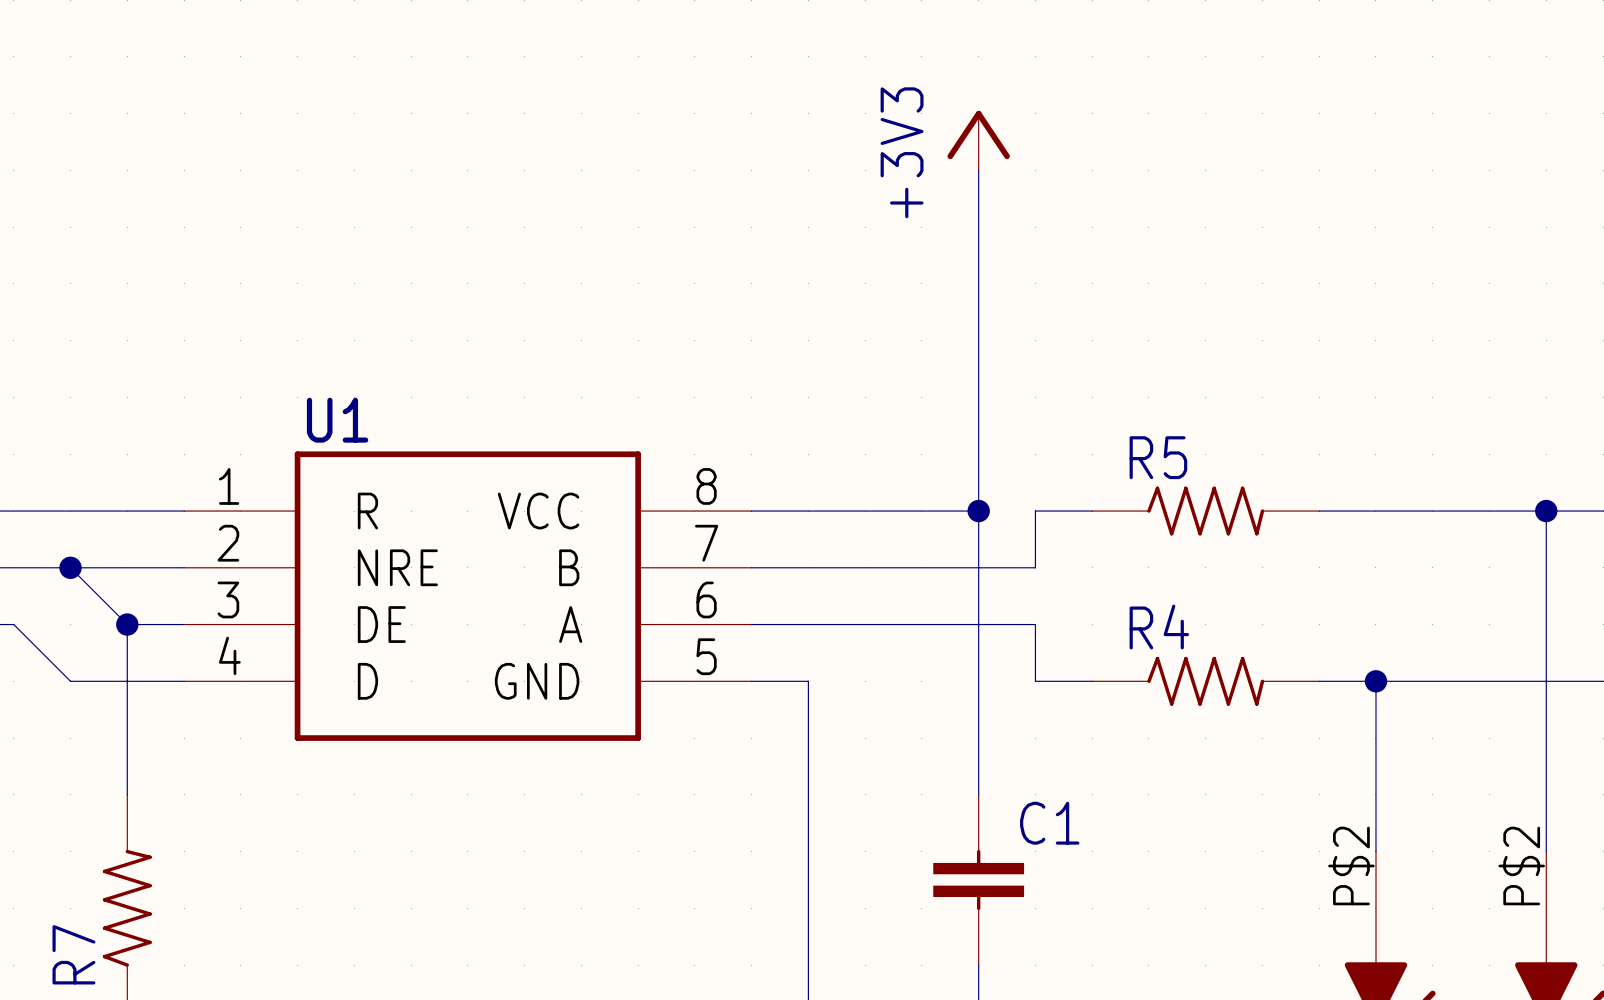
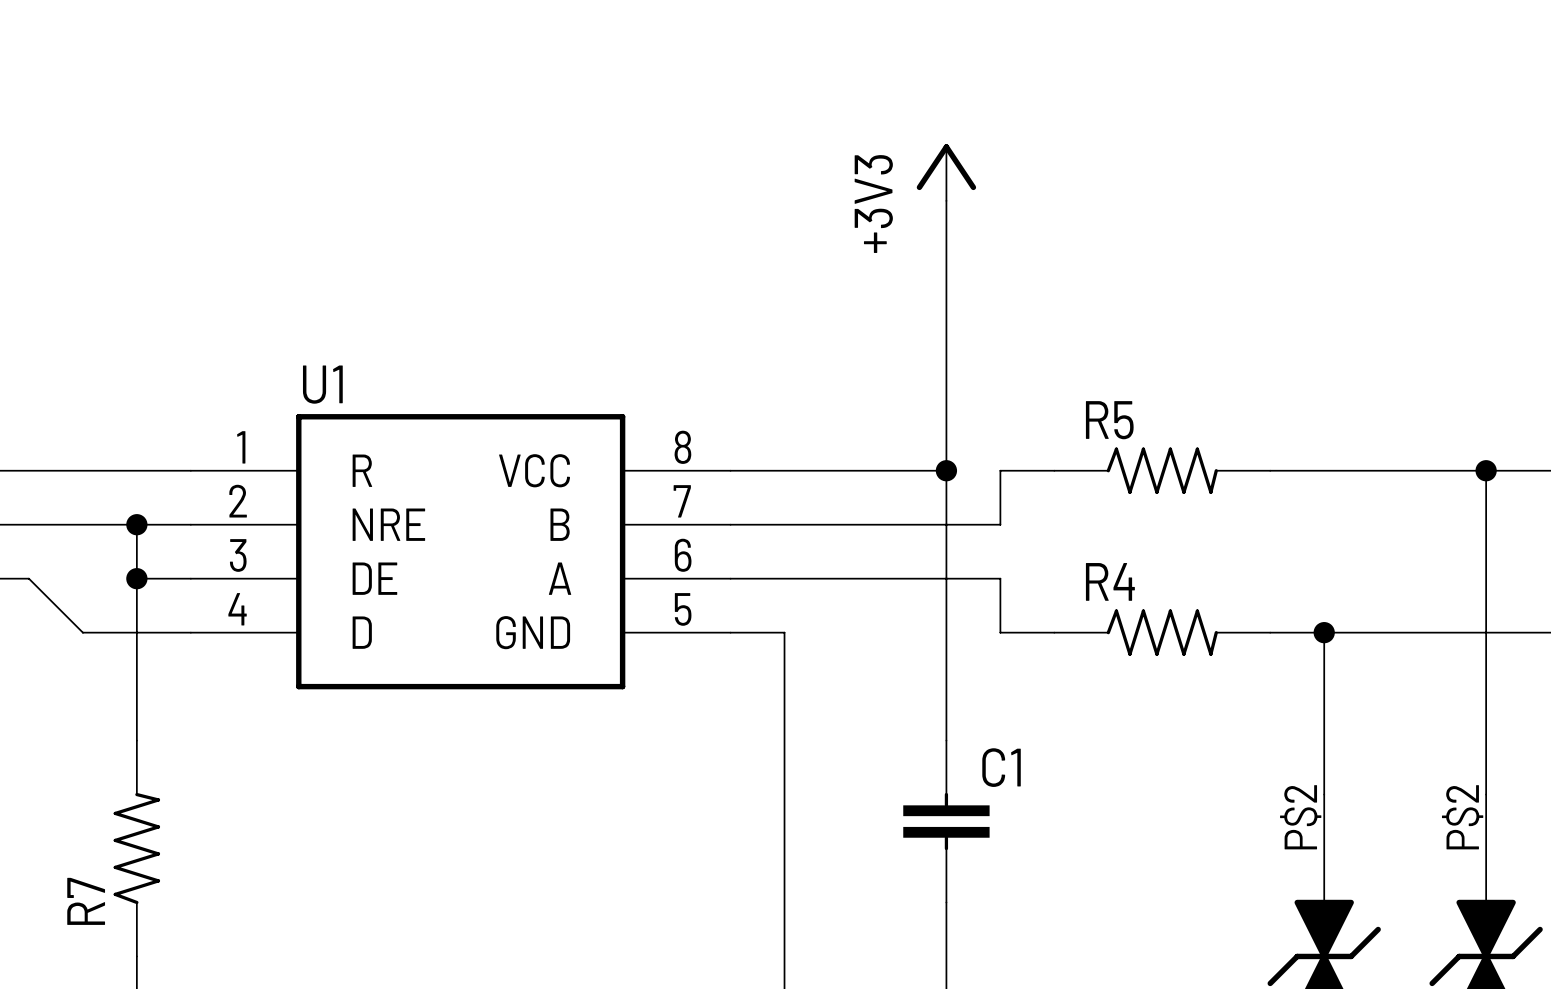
power symbol position: +3V3 (978, 140) -> +3V3 (946, 172)
wire: (70, 567) (127, 624) -> (136, 524) (136, 578)
junction position: (70, 567) -> (136, 524)

